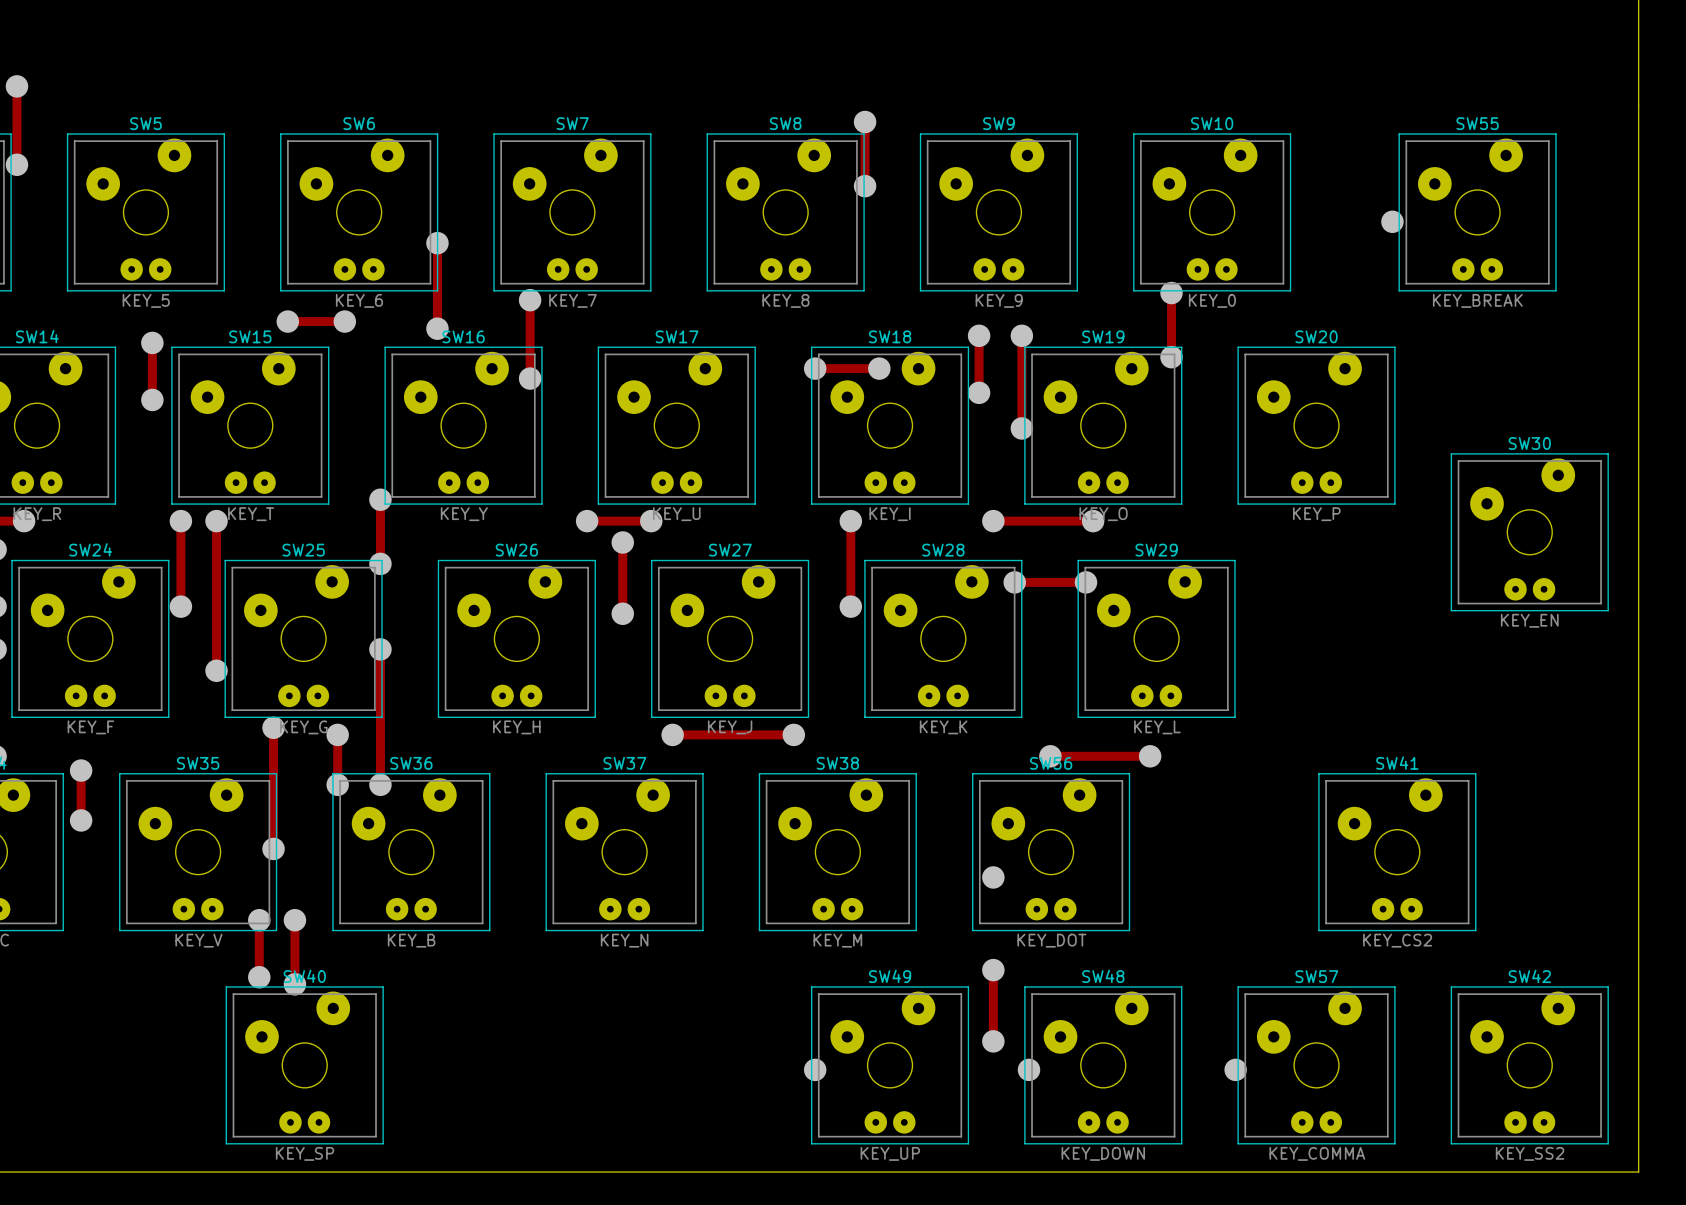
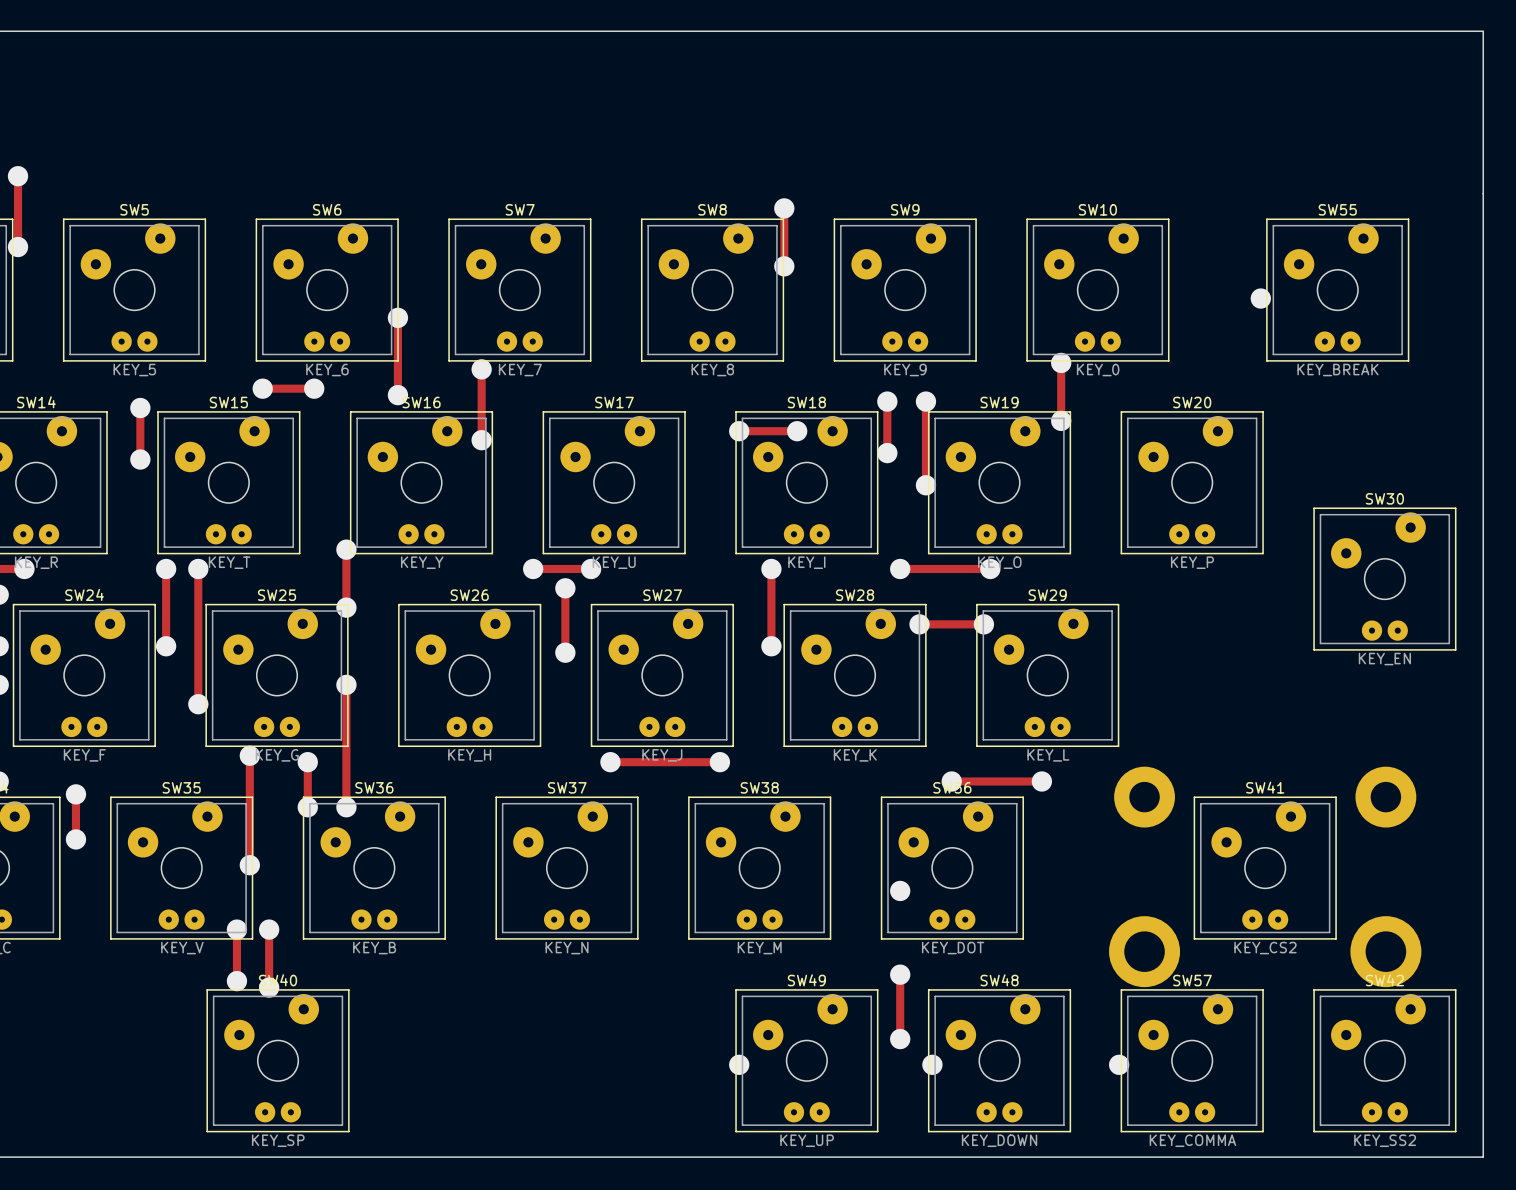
SW41 footprint: [1318, 773, 1477, 932] -> [1109, 766, 1422, 988]

